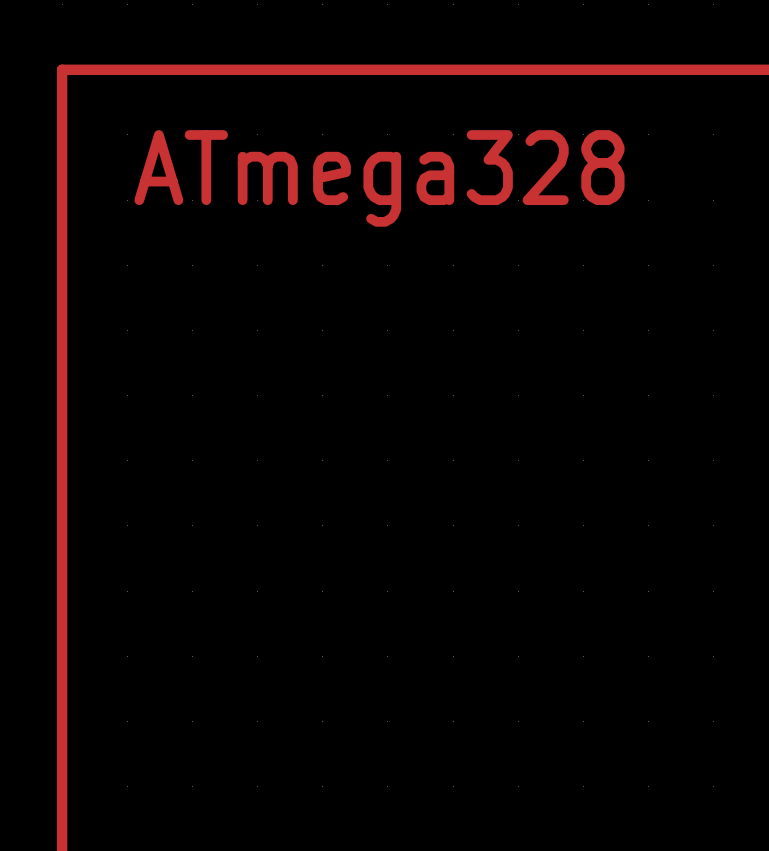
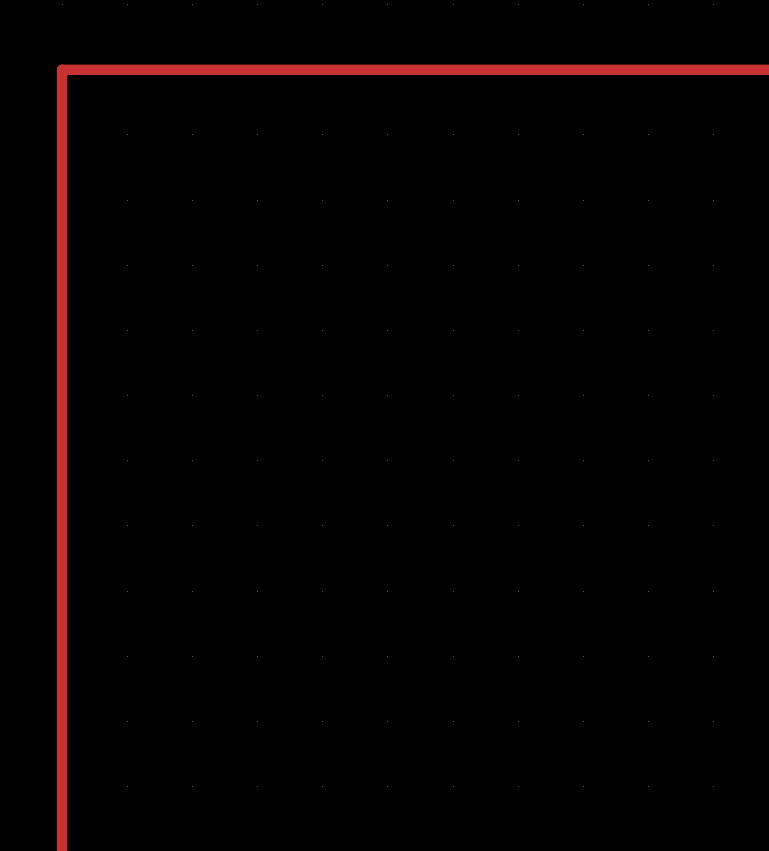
text: ATmega328 (379, 178) -> none

